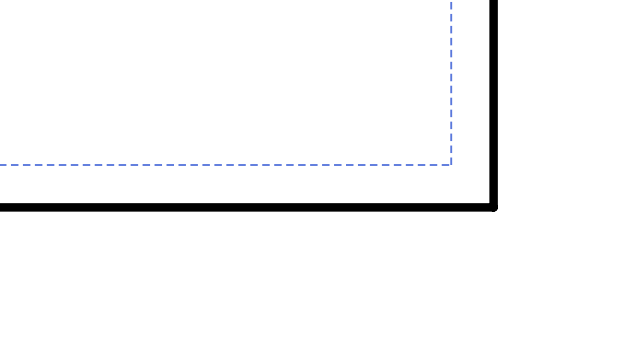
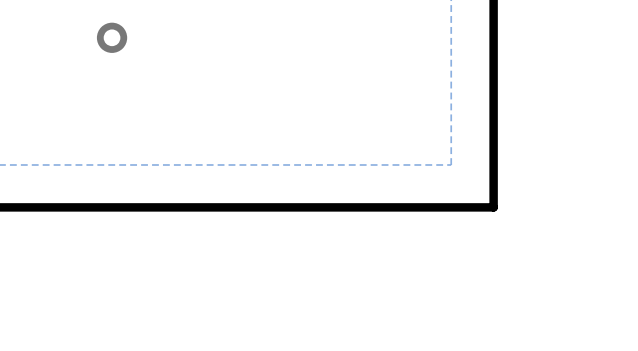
via: none -> (112, 37)

